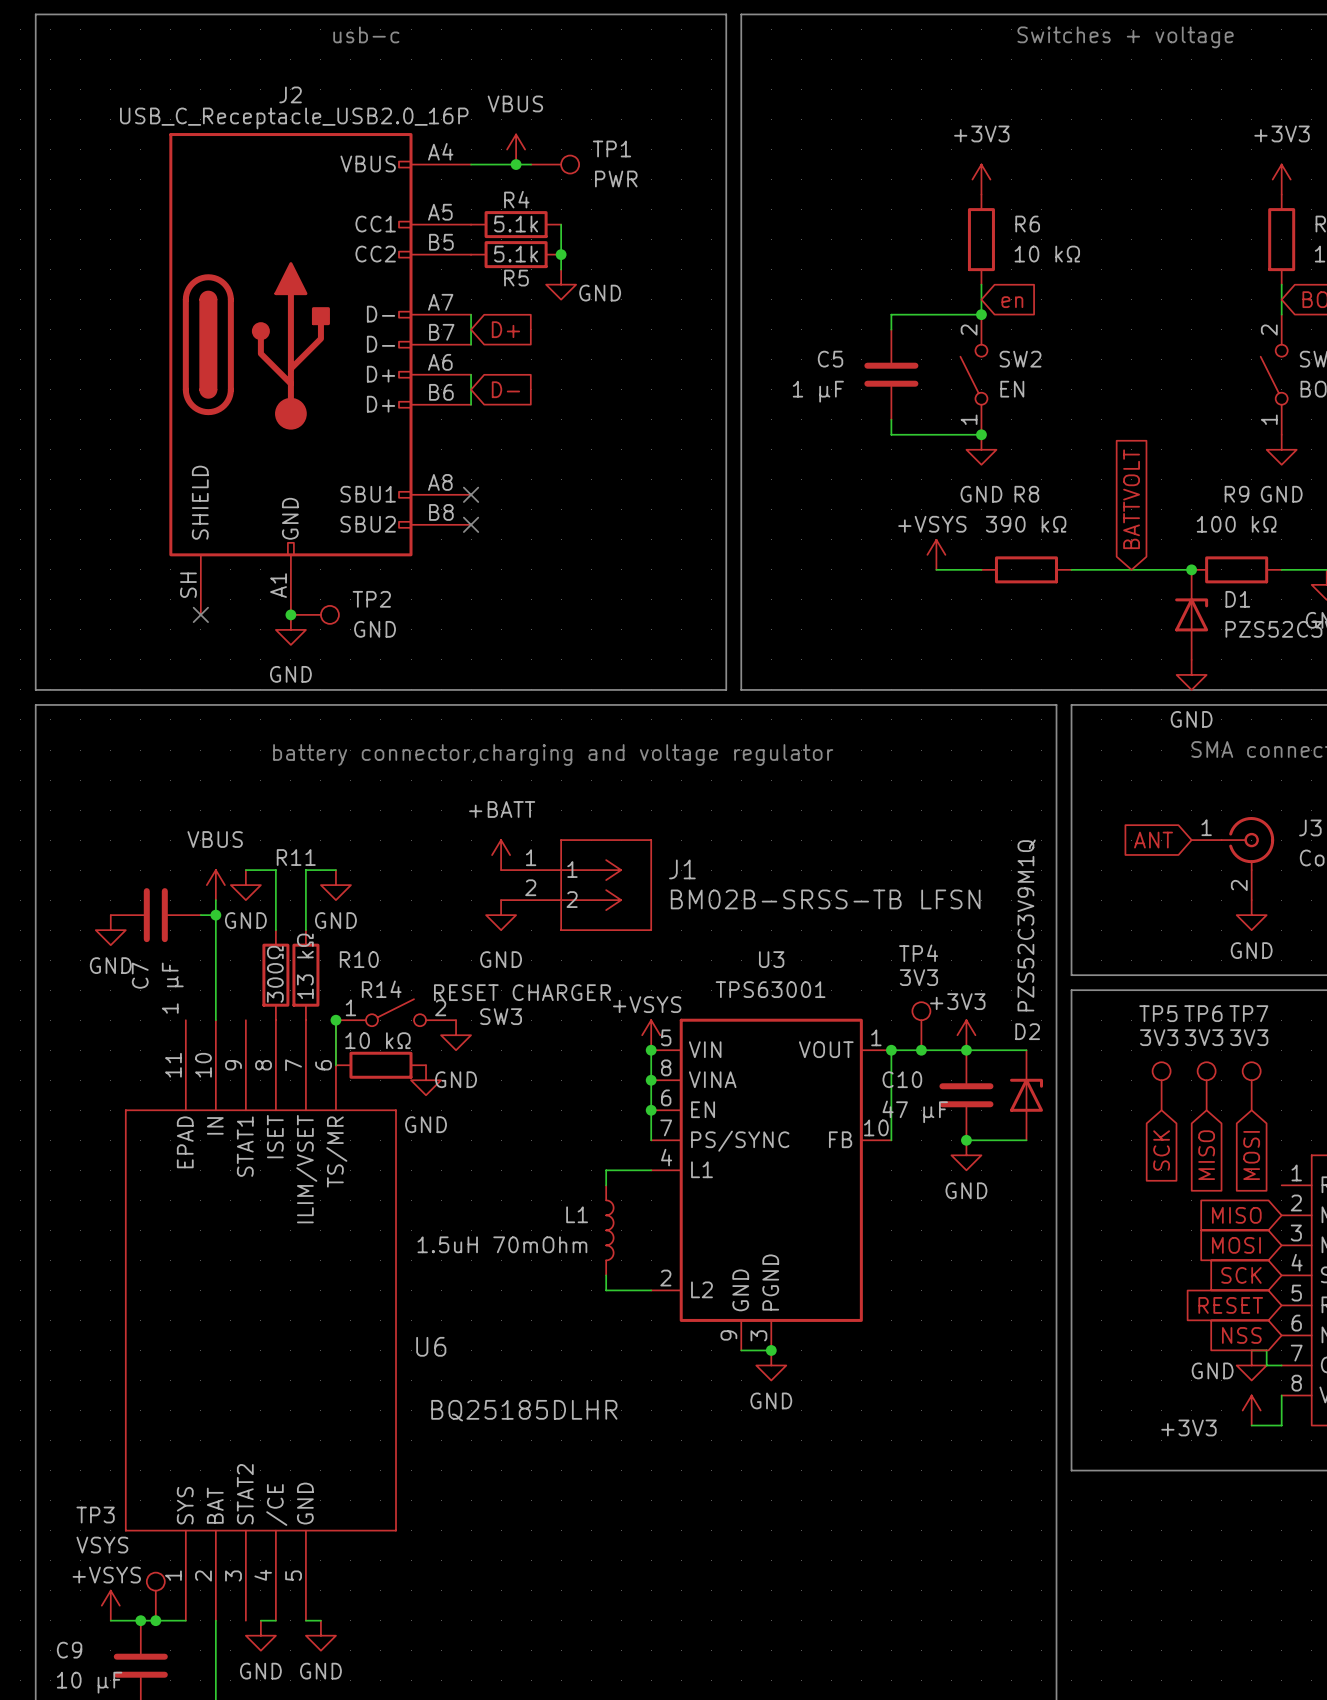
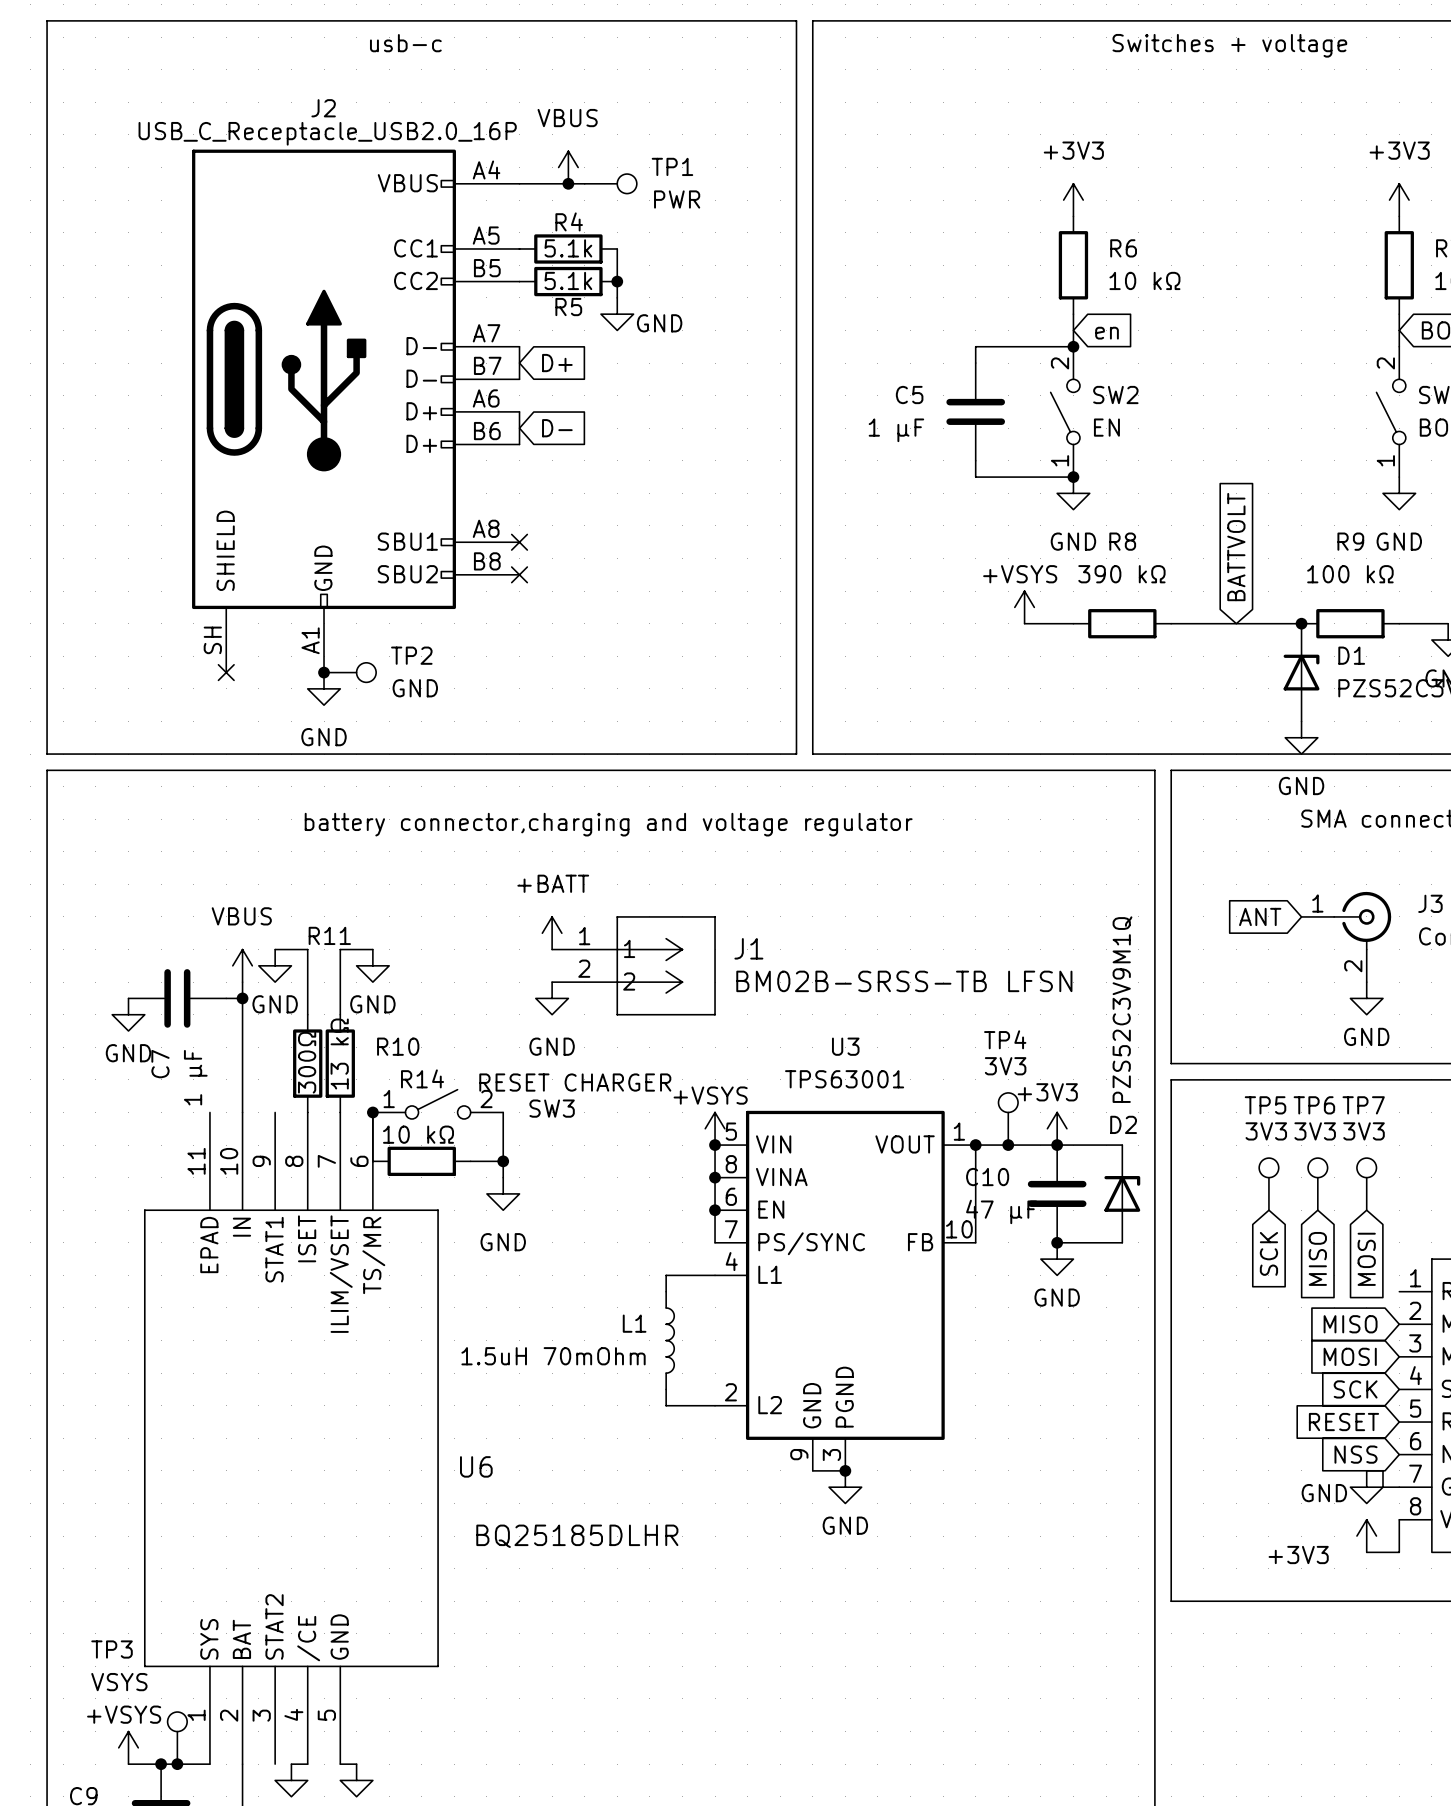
wire: none -> (503, 1112) (503, 1177)
power symbol: GND (456, 1035) -> none
wire: none -> (470, 1161) (503, 1161)
junction: none -> (503, 1161)
power symbol: GND (426, 1080) -> none
power symbol: none -> GND (503, 1193)

